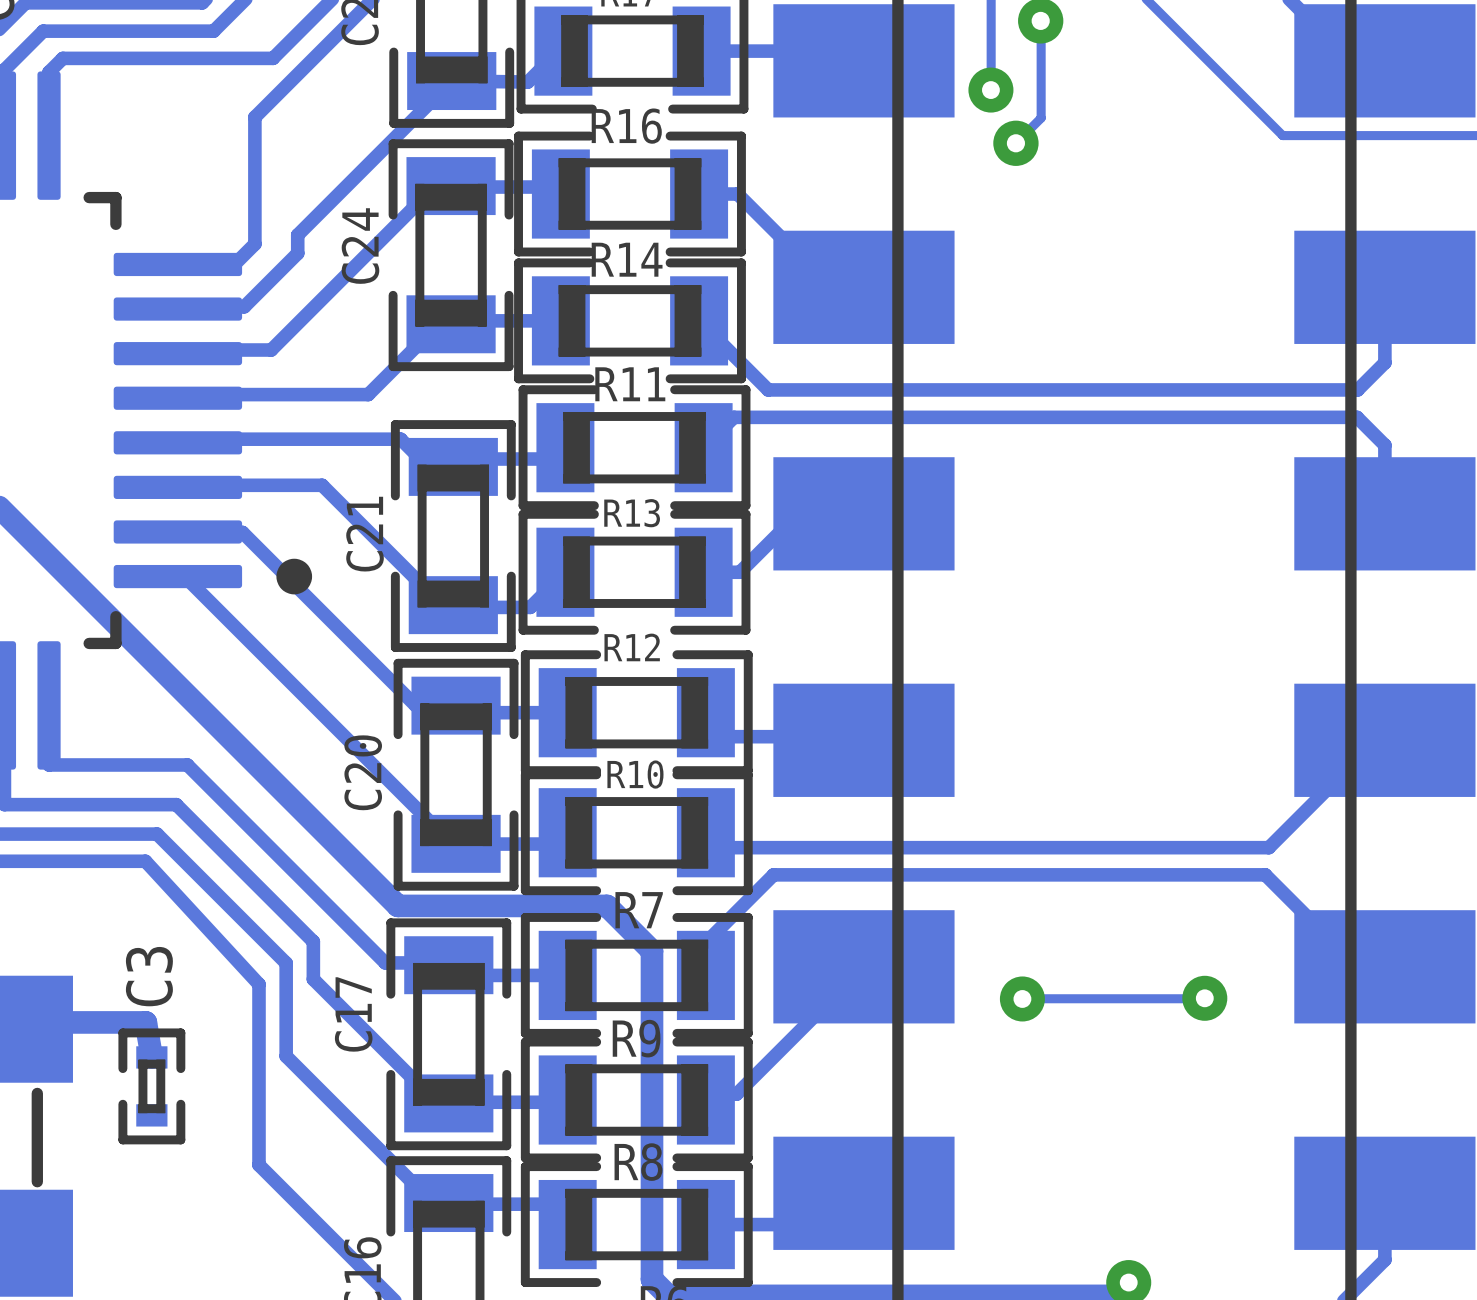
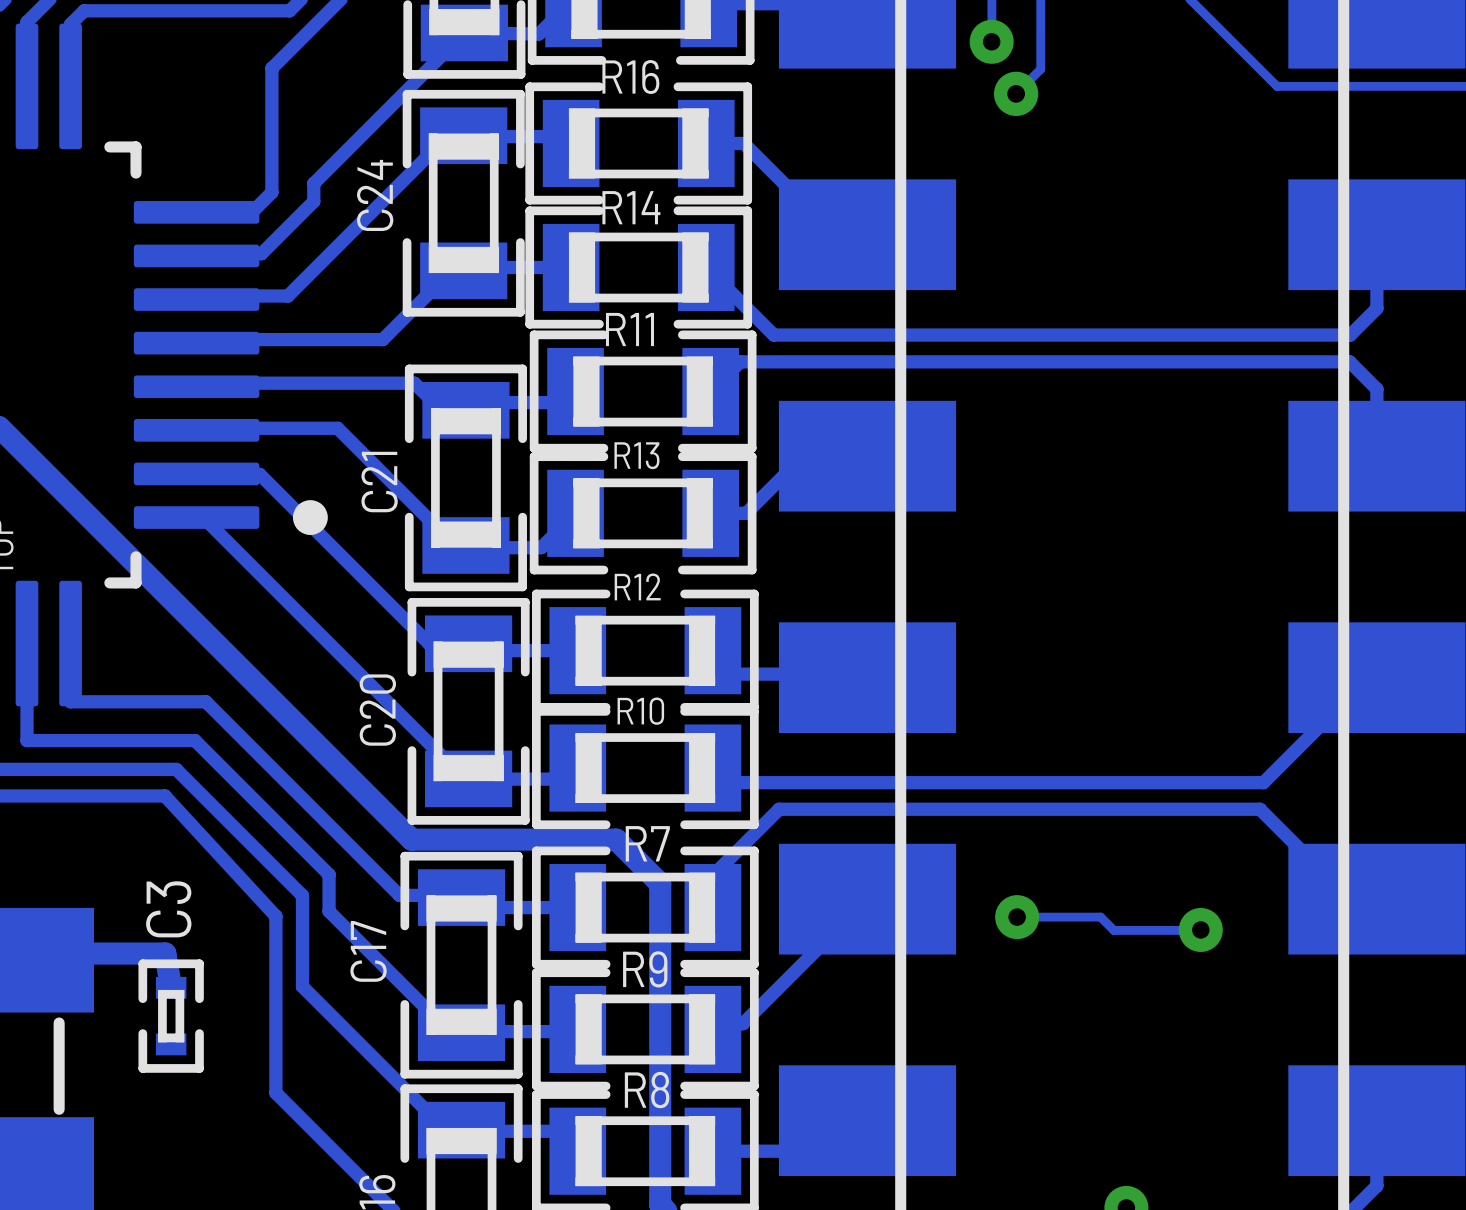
via position: (1022, 998) -> (1017, 917)
track: (1115, 998) (1022, 998) -> (1113, 930) (1100, 917) (1017, 917)

